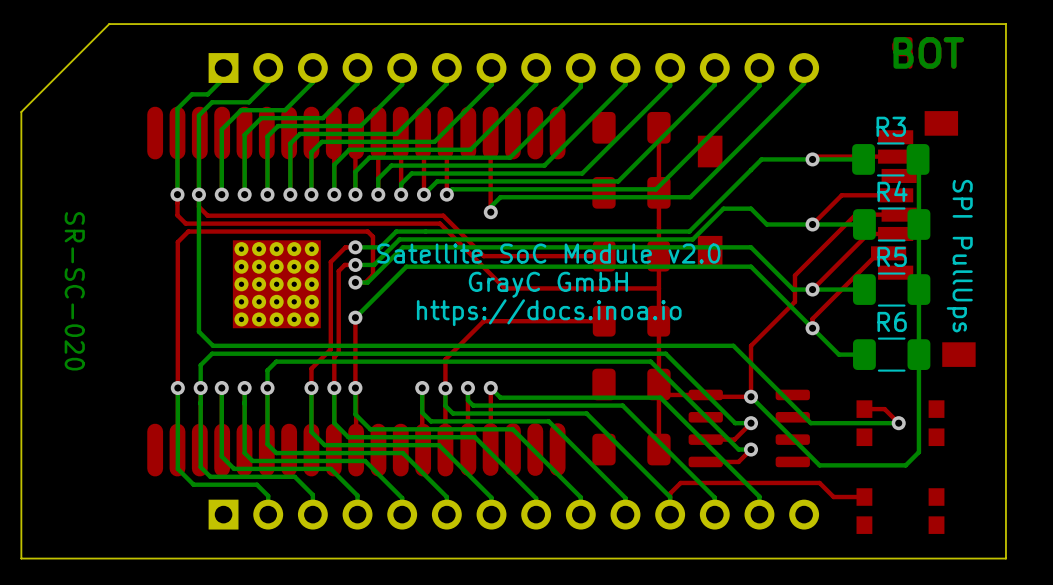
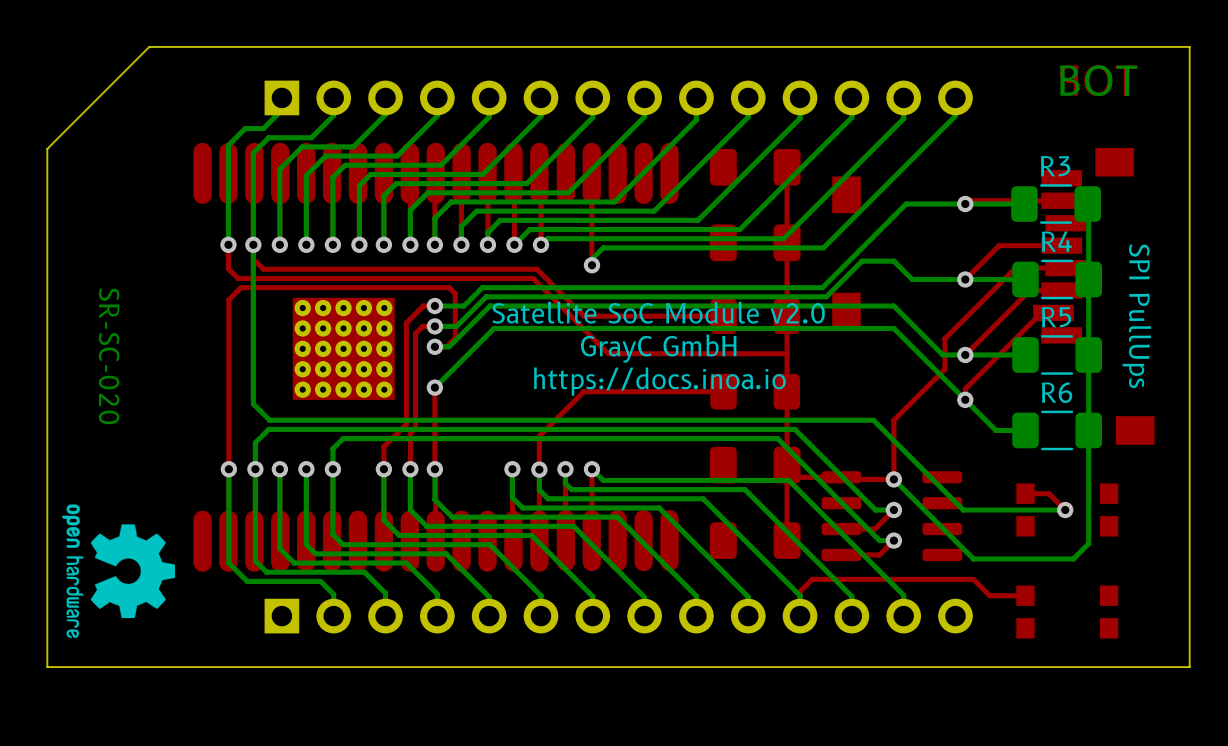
drawing: none -> [62, 504, 176, 638]

